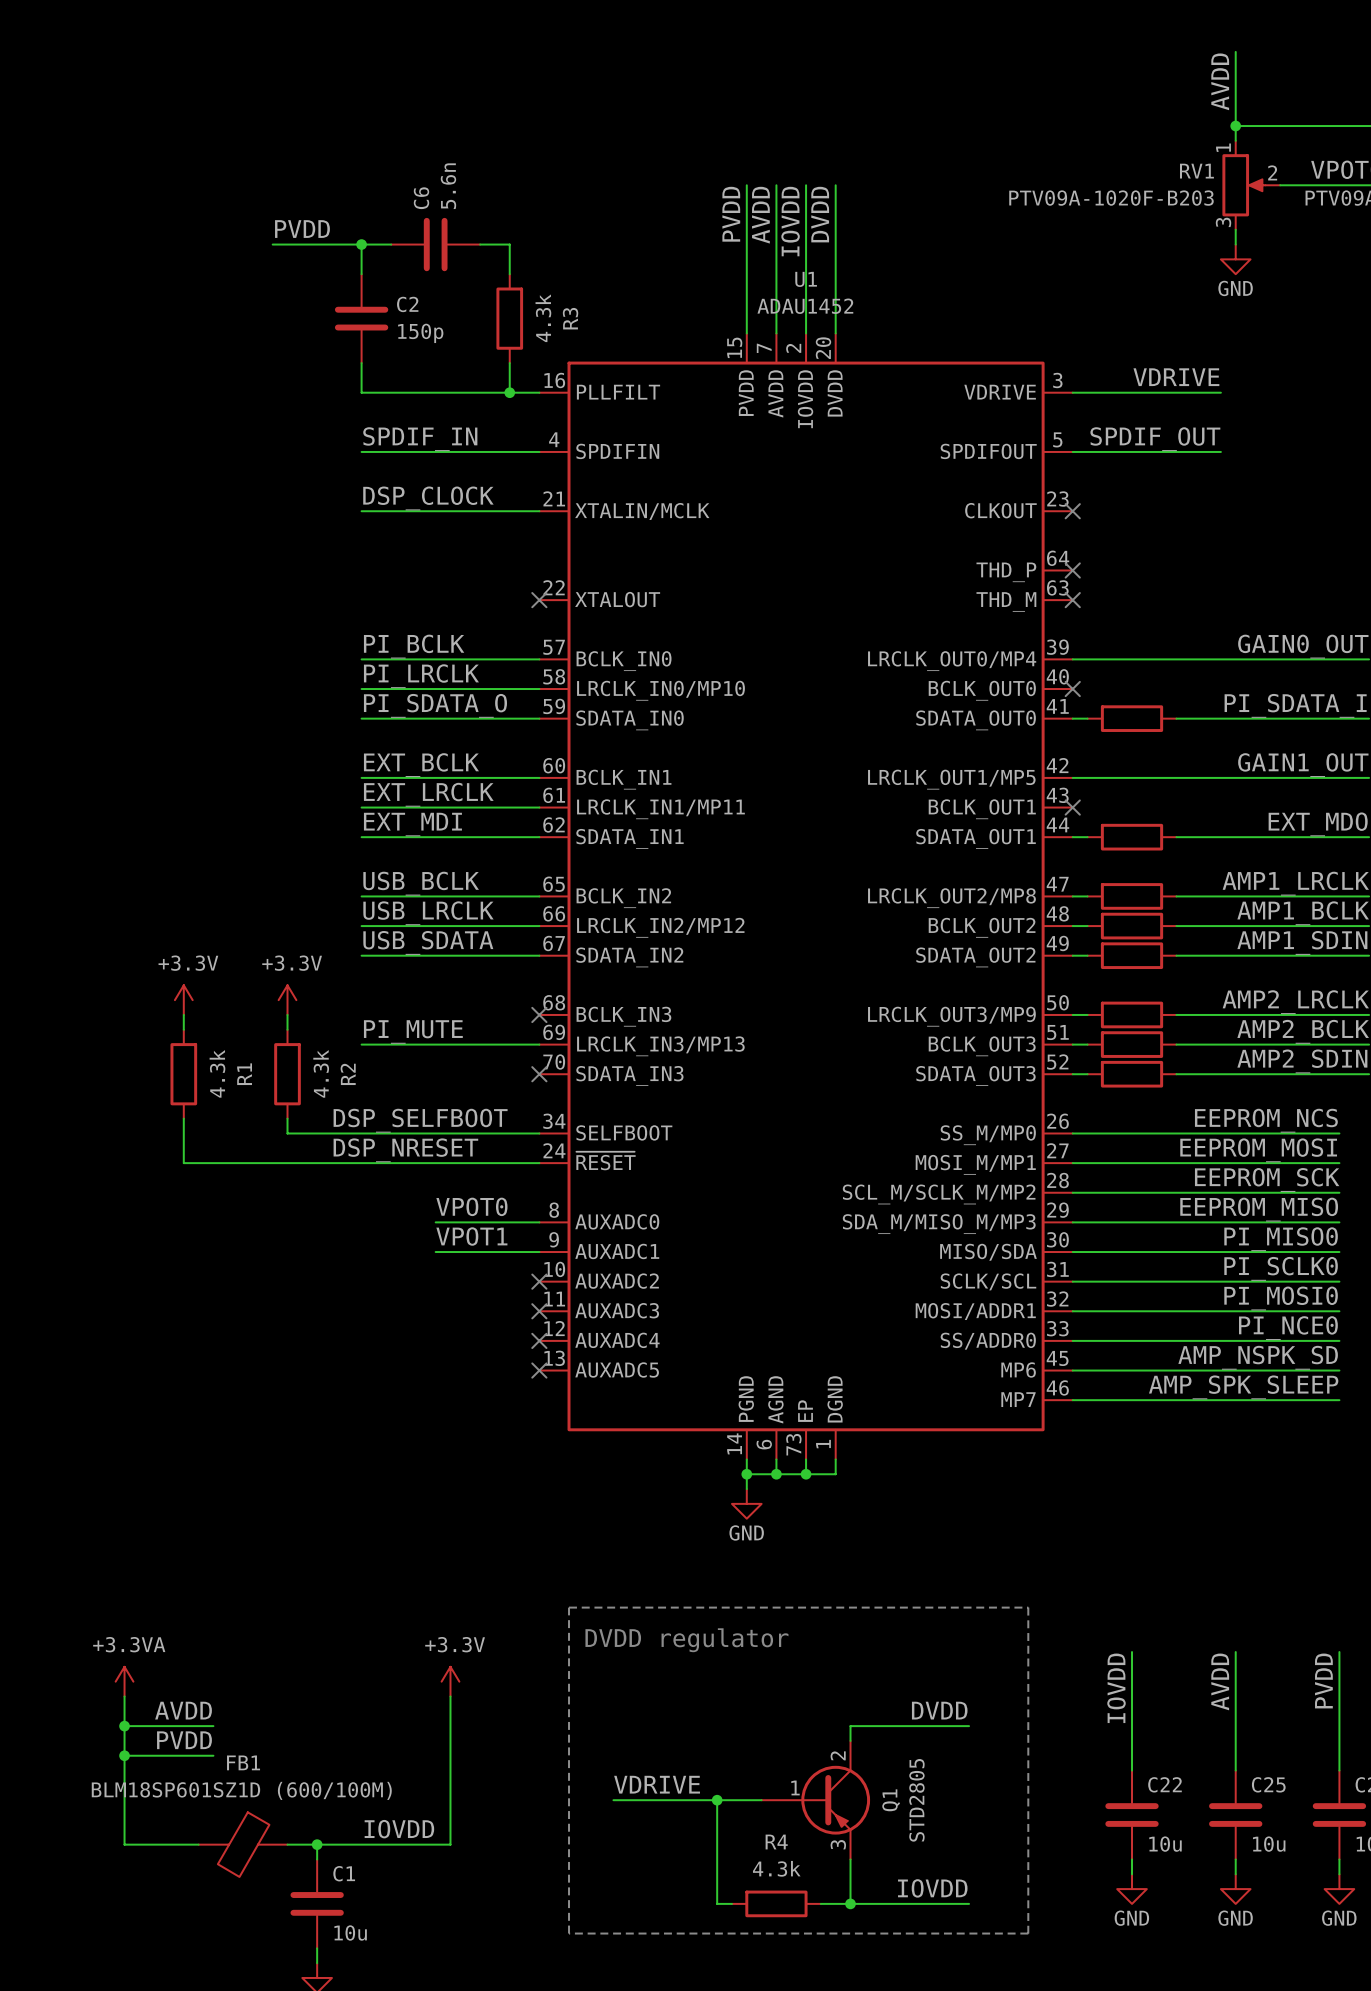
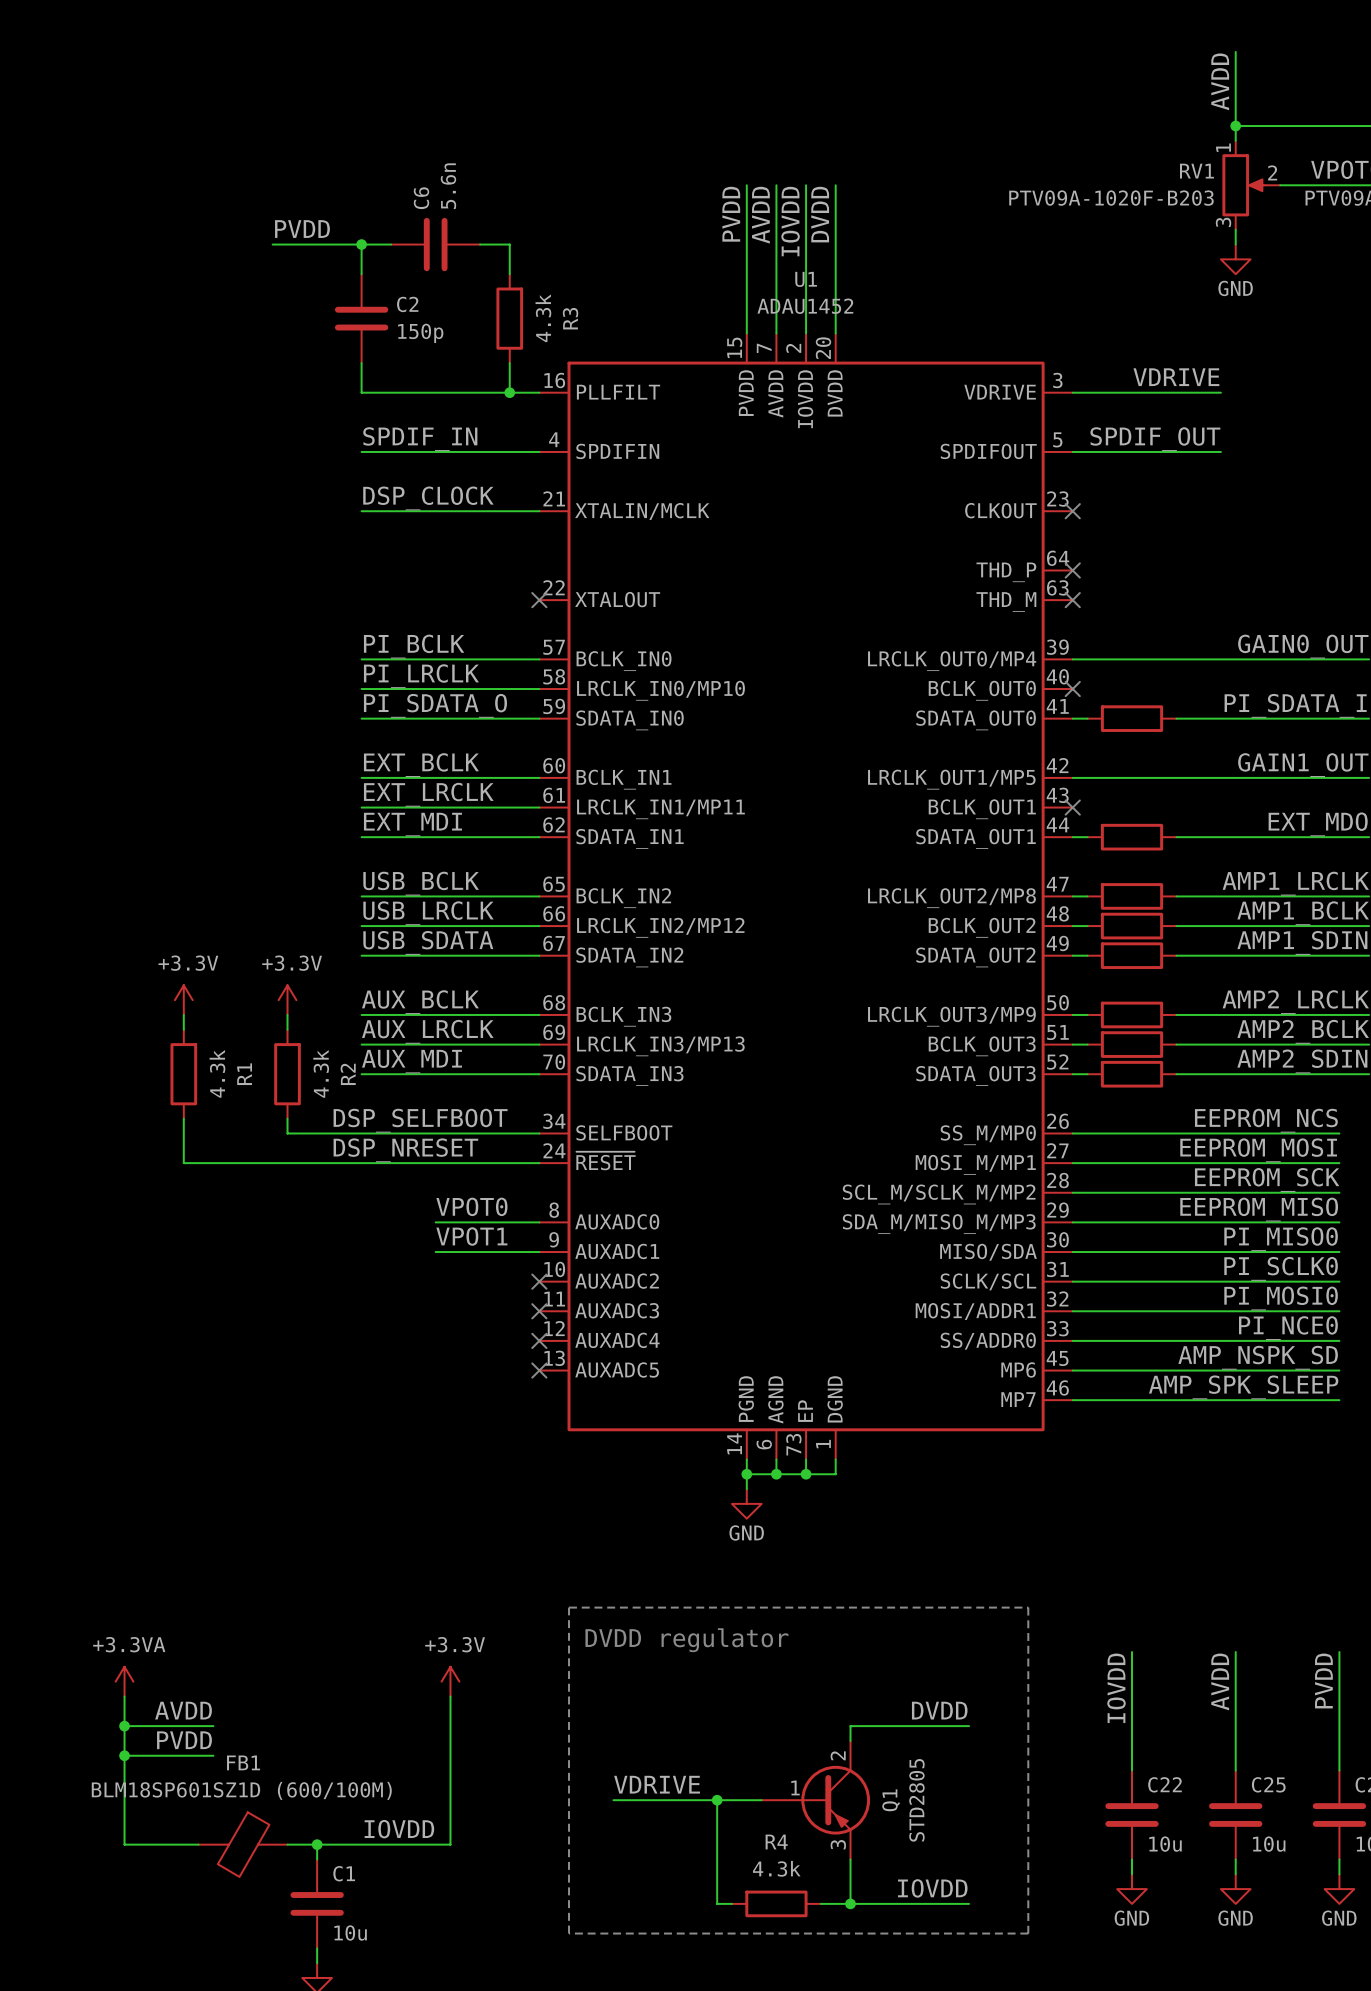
label: none -> AUX_BCLK (420, 1002)
wire: none -> (361, 1014) (539, 1014)
no-connect mark: (539, 1014) -> none
label: PI_MUTE (413, 1031) -> AUX_LRCLK (427, 1031)
label: none -> AUX_MDI (411, 1061)
wire: none -> (361, 1074) (539, 1074)
no-connect mark: (539, 1074) -> none

